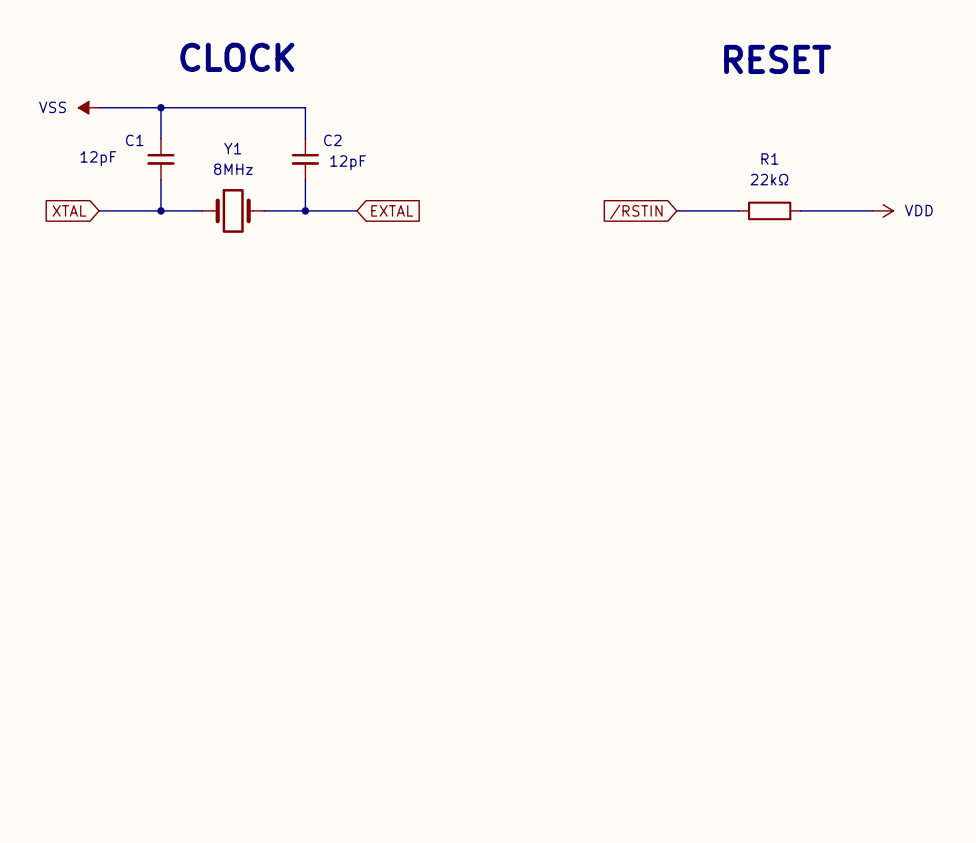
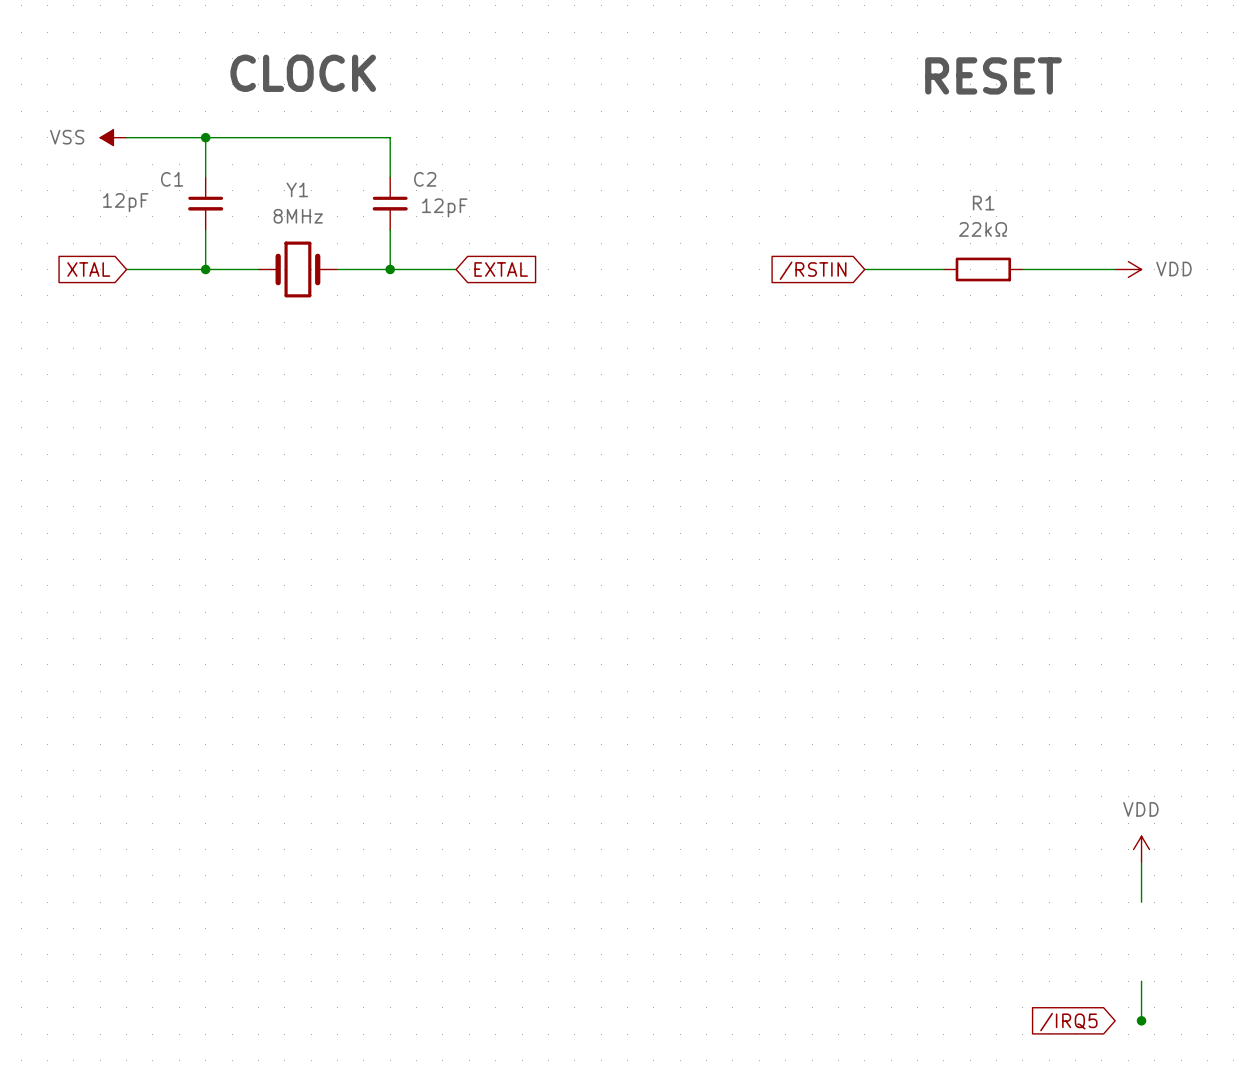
power symbol: none -> VDD (1141, 849)
wire: none -> (1141, 862) (1141, 902)
wire: none -> (1141, 981) (1141, 1020)
junction: none -> (1141, 1020)
global label: none -> /IRQ5 (1068, 1022)

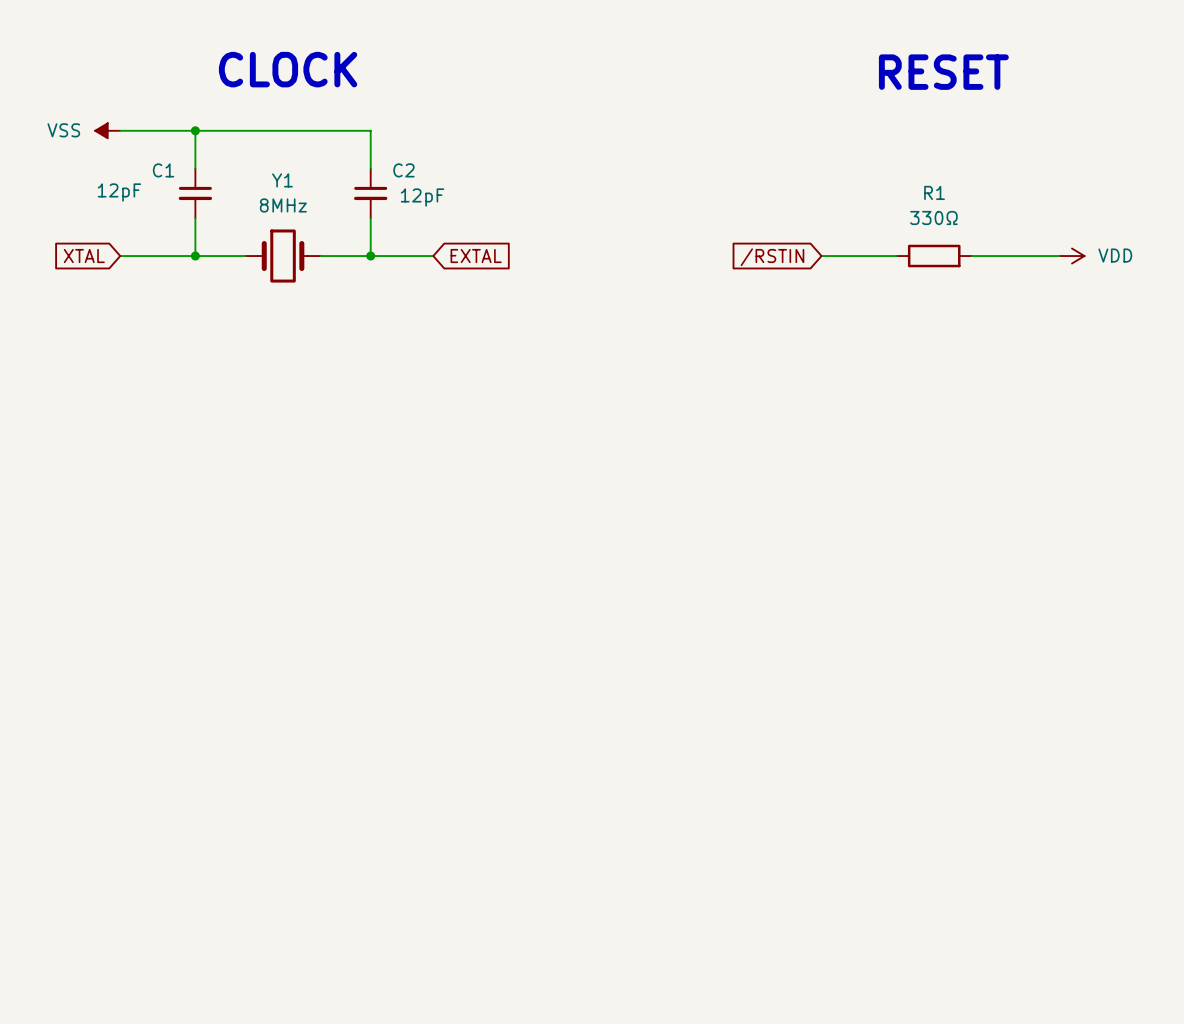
R1 value: 22kΩ (983, 229) -> 330Ω (933, 217)
power symbol: VDD (1141, 849) -> none
wire: (1141, 862) (1141, 902) -> none
wire: (1141, 981) (1141, 1020) -> none
junction: (1141, 1020) -> none
global label: /IRQ5 (1068, 1022) -> none

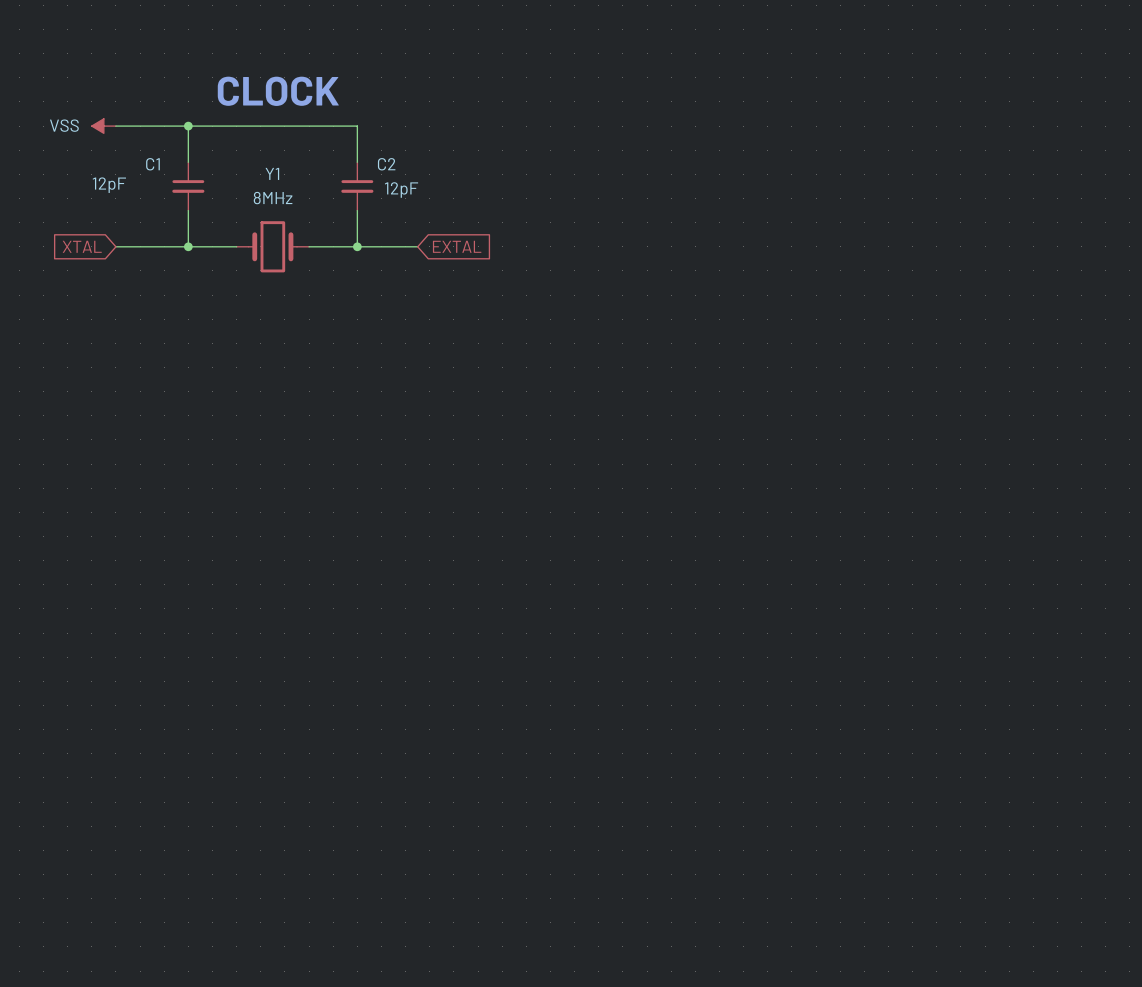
text position: CLOCK (288, 69) -> CLOCK (278, 91)
text: RESET (943, 72) -> none
wire: (821, 256) (896, 256) -> none
R1: 330Ω (934, 256) -> none
wire: (971, 256) (1059, 256) -> none
power symbol: VDD (1071, 256) -> none
global label: /RSTIN (772, 257) -> none

